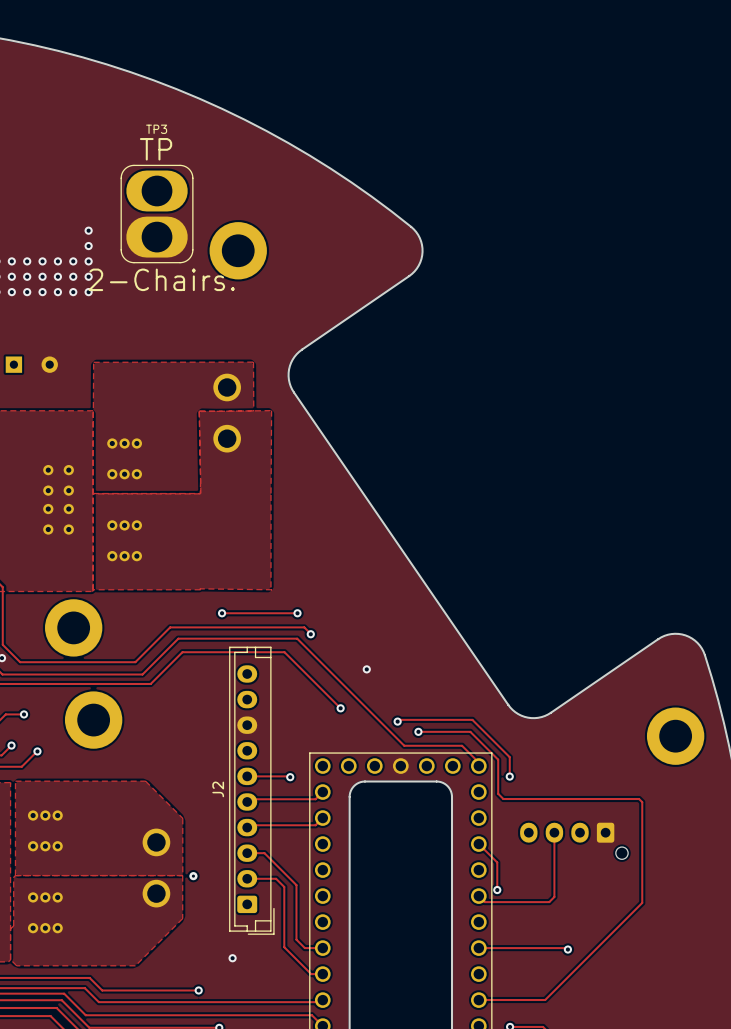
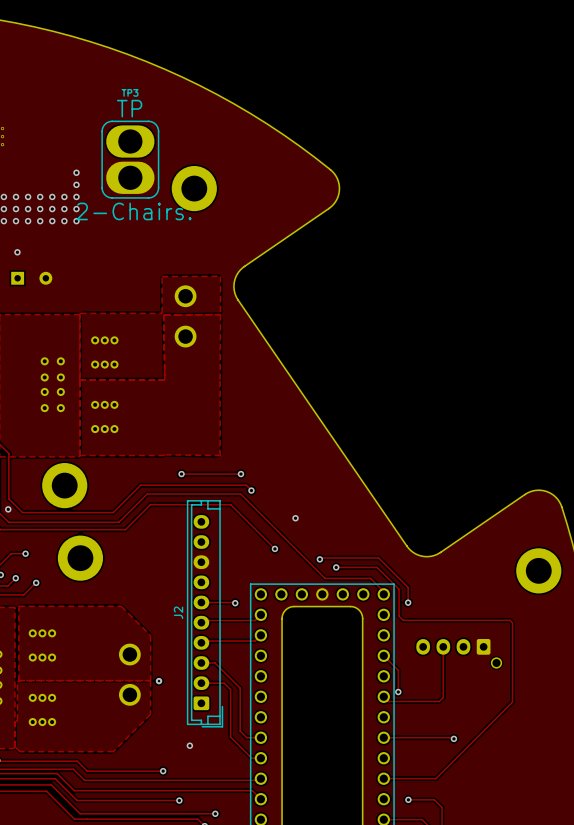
via: none -> (17, 252)
zone outline: (199, 411) (253, 410) (253, 362) (93, 362) (92, 494) -> (163, 315) (220, 314) (220, 276) (162, 276) (162, 313) (80, 313) (79, 380)

